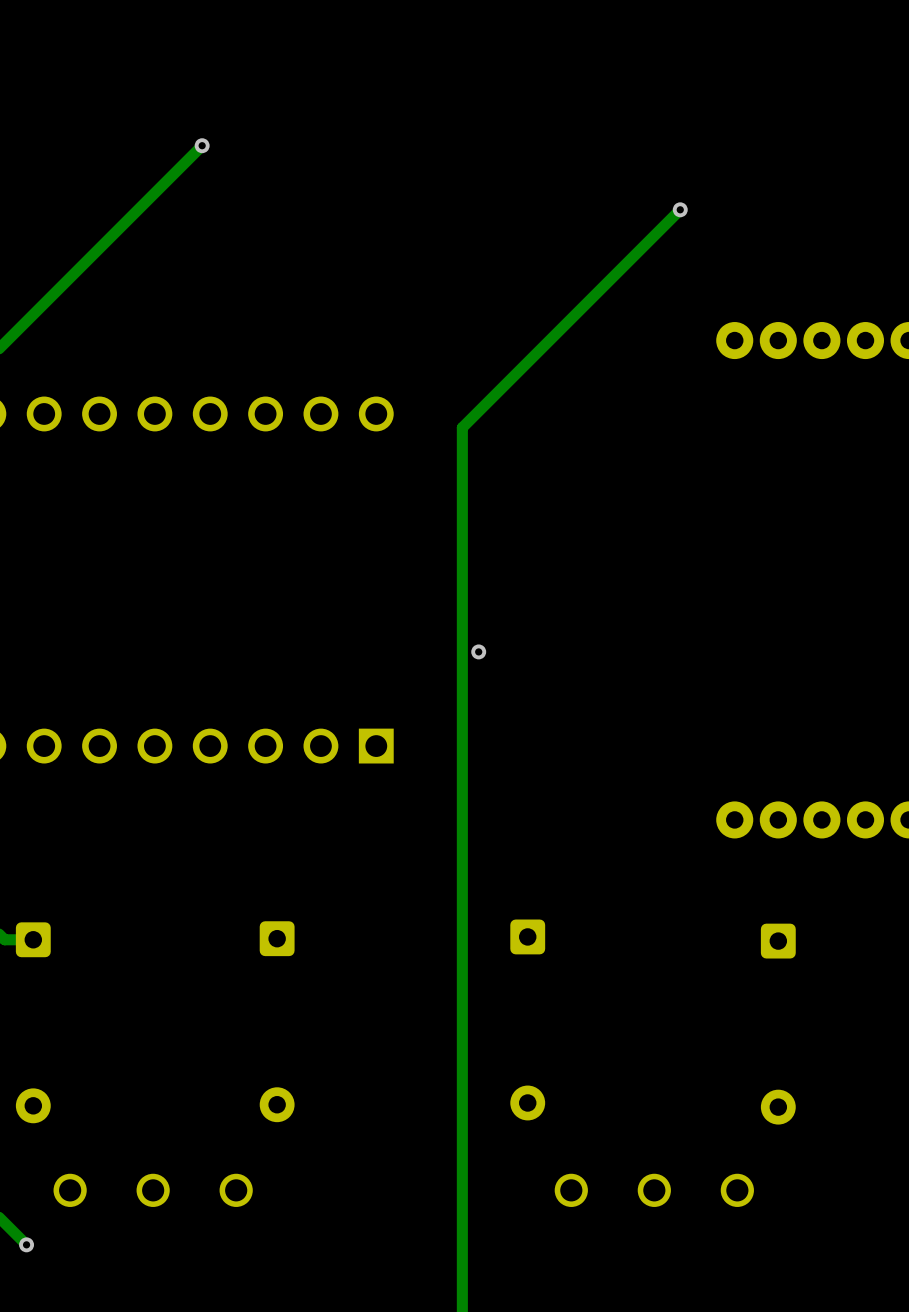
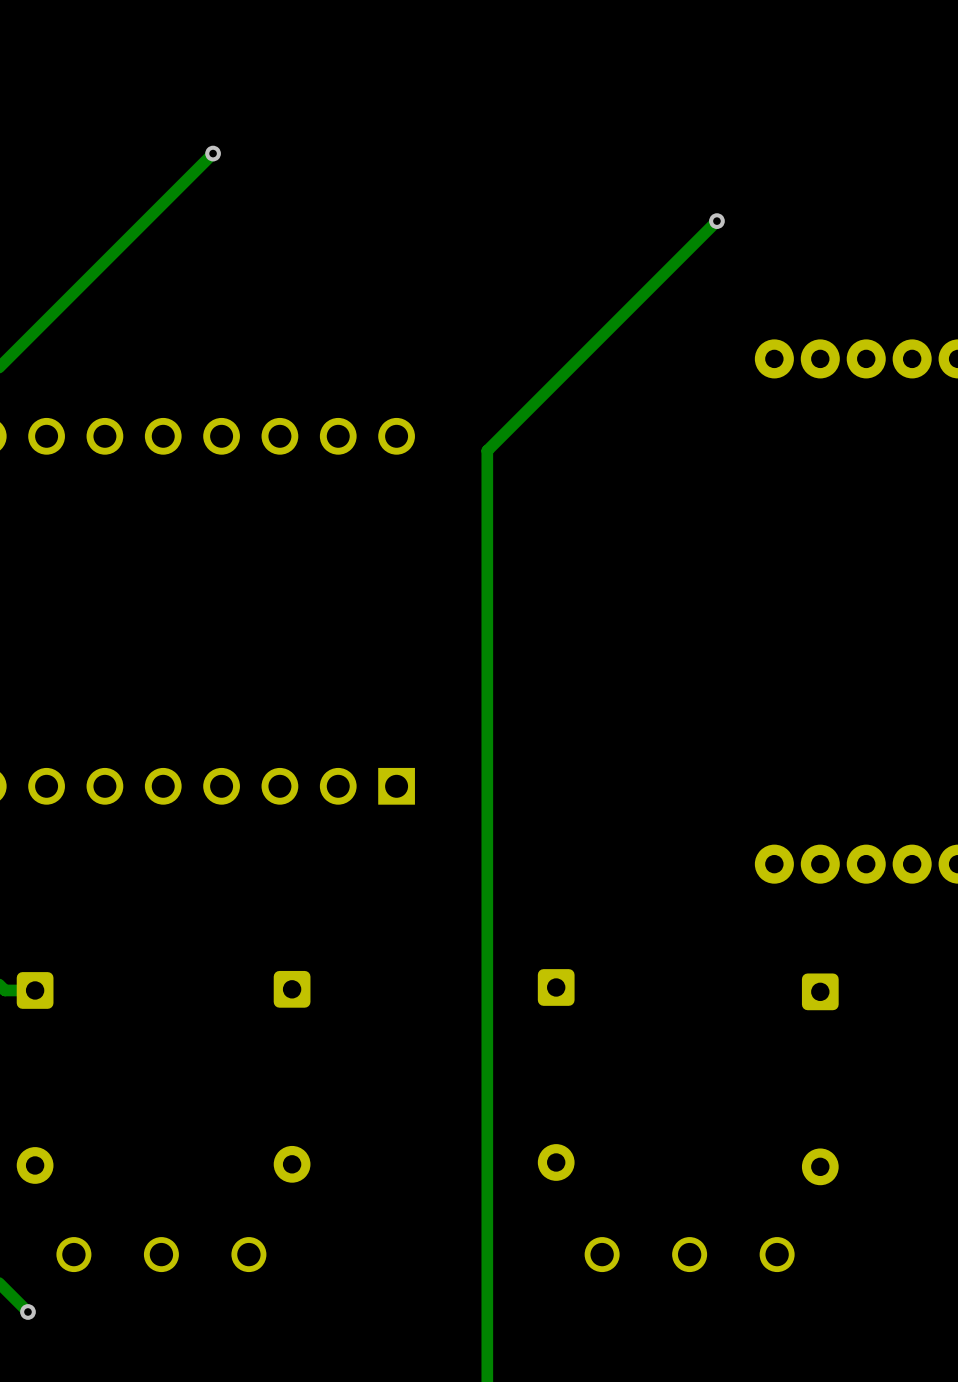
via: (478, 651) -> none

